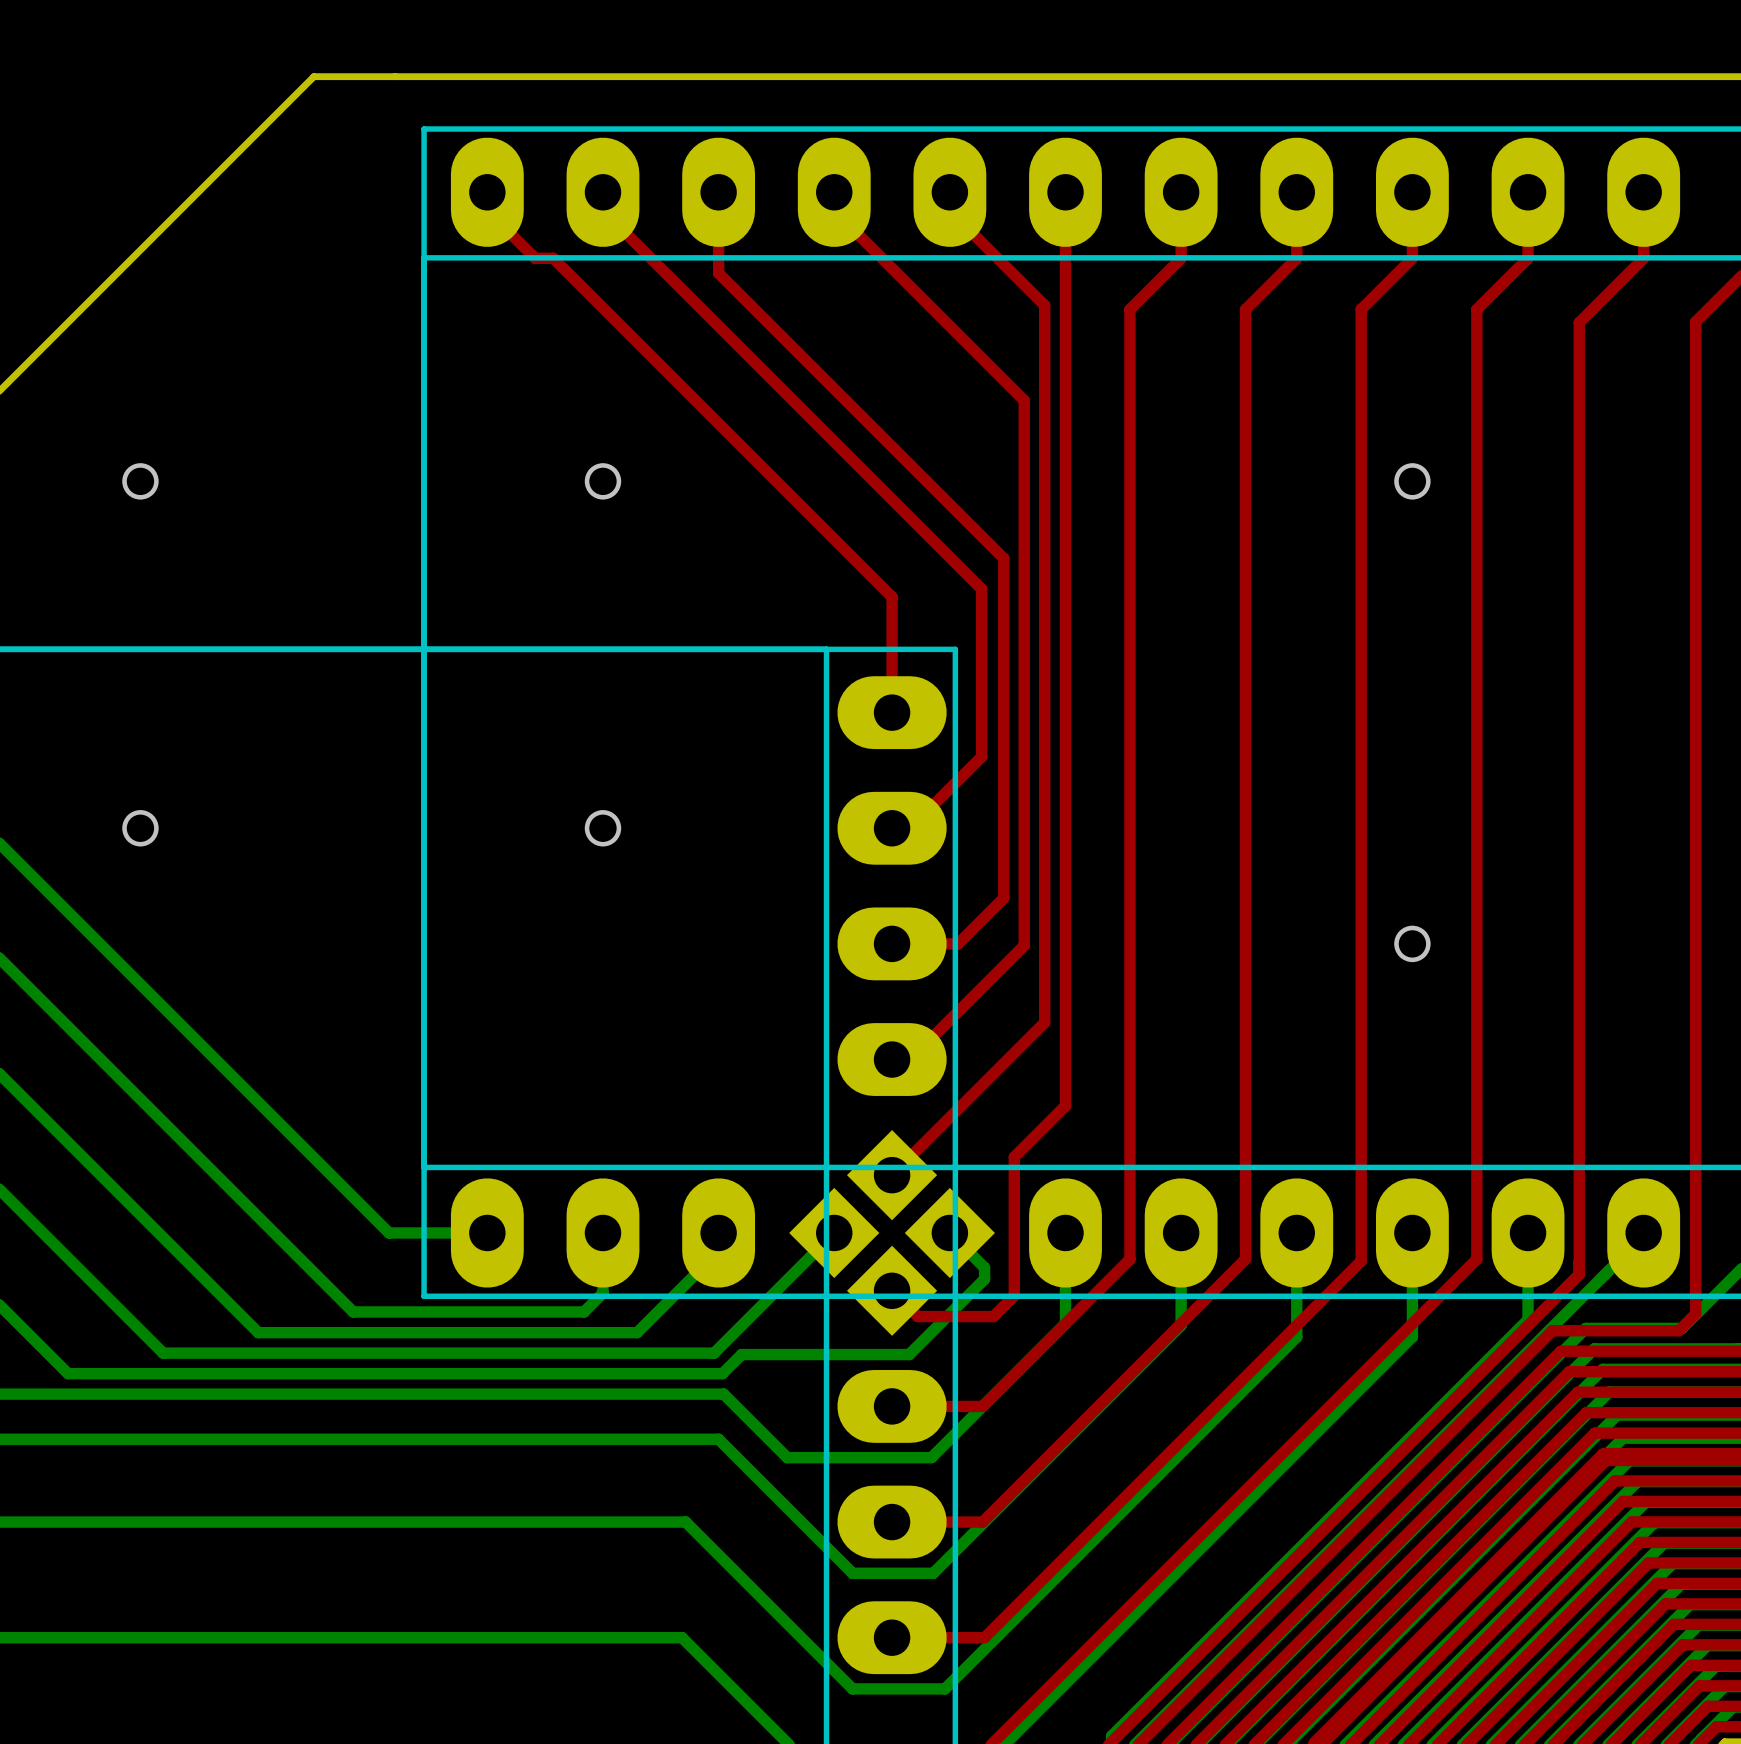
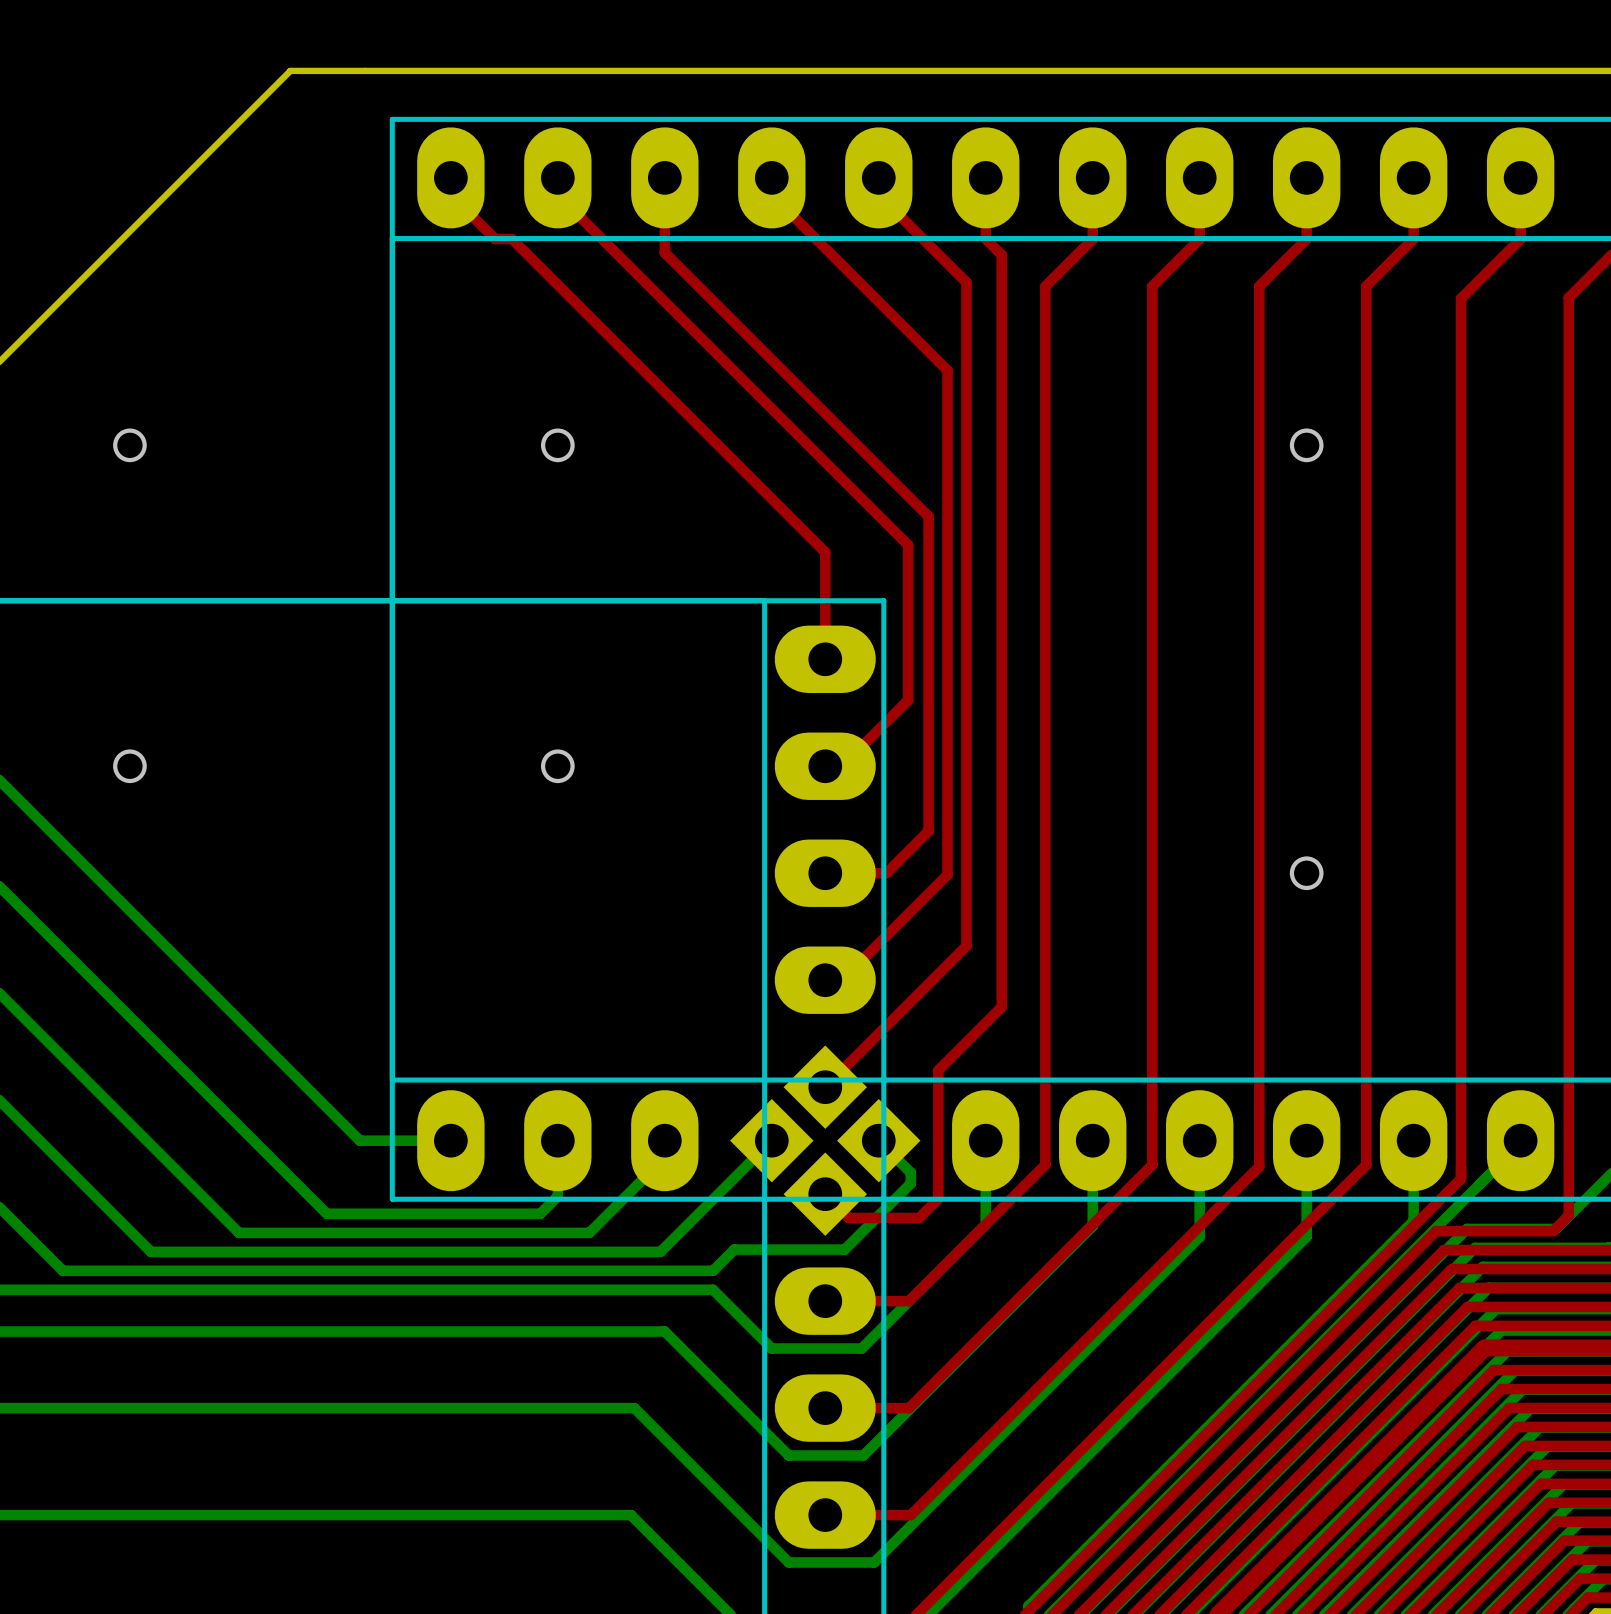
top track: (1065, 258) (1065, 1105) -> (985, 238) (1001, 255) (1001, 1006) (985, 1023)
bottom track: (913, 1350) (909, 1354) (741, 1354) (722, 1373) -> (844, 1249) (734, 1249) (713, 1270) (668, 1270)
bottom track: (723, 1394) (787, 1457) (834, 1457) -> (669, 1289) (713, 1289) (771, 1348)

